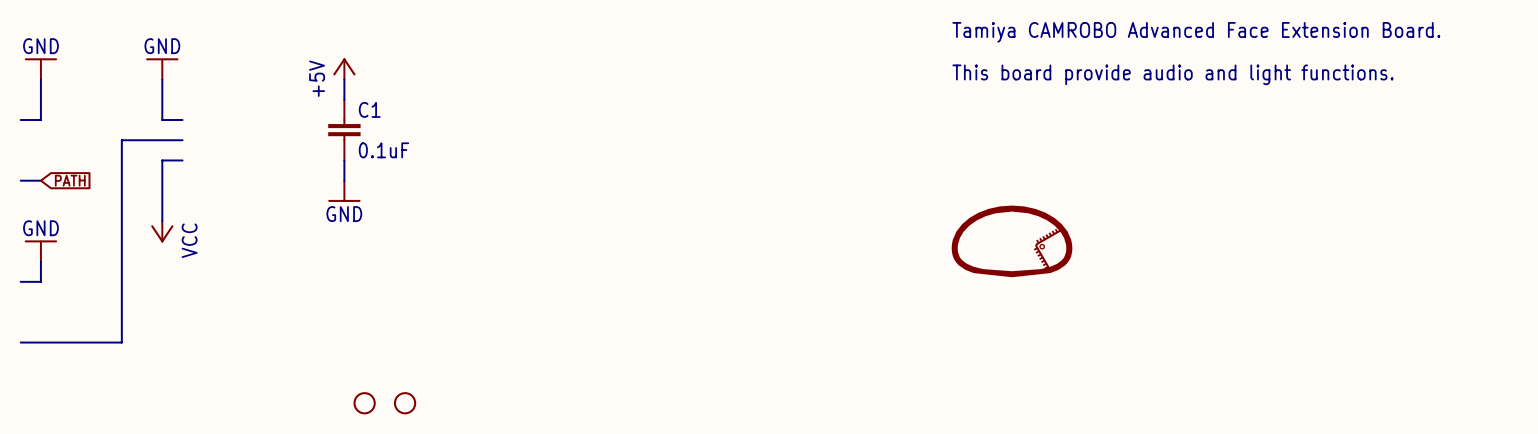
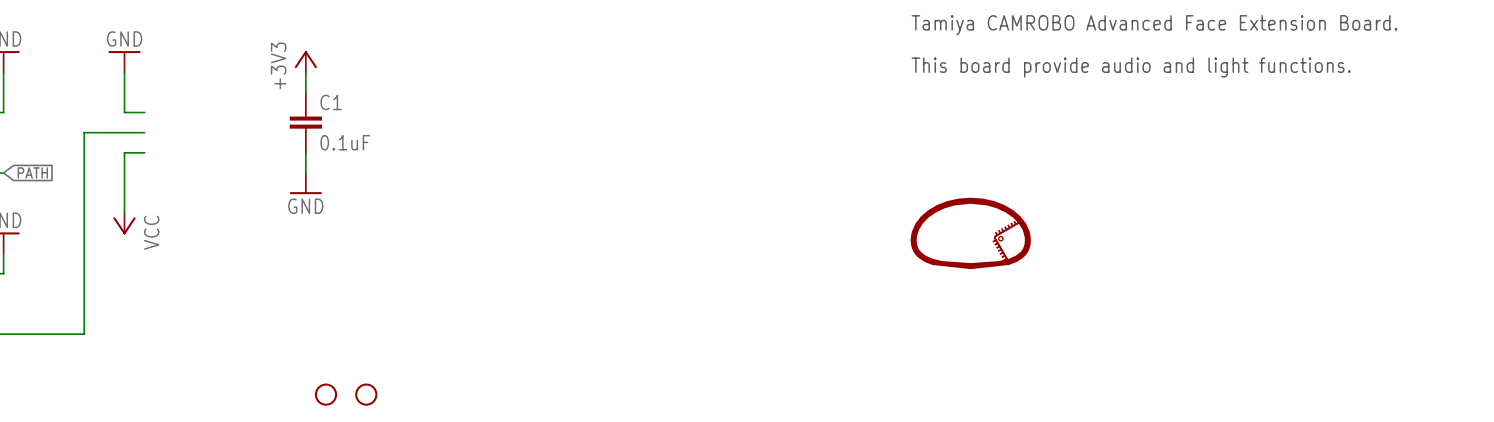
power symbol: +5V (344, 68) -> +3V3 (305, 61)

